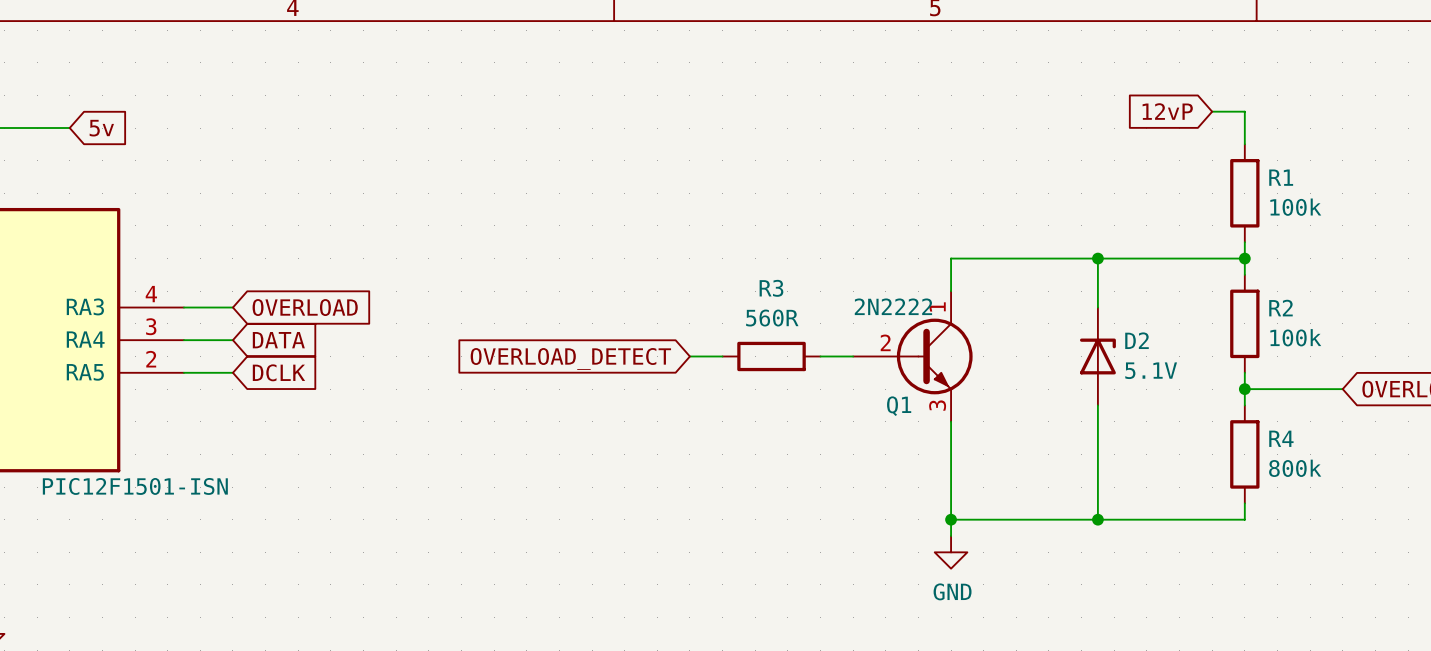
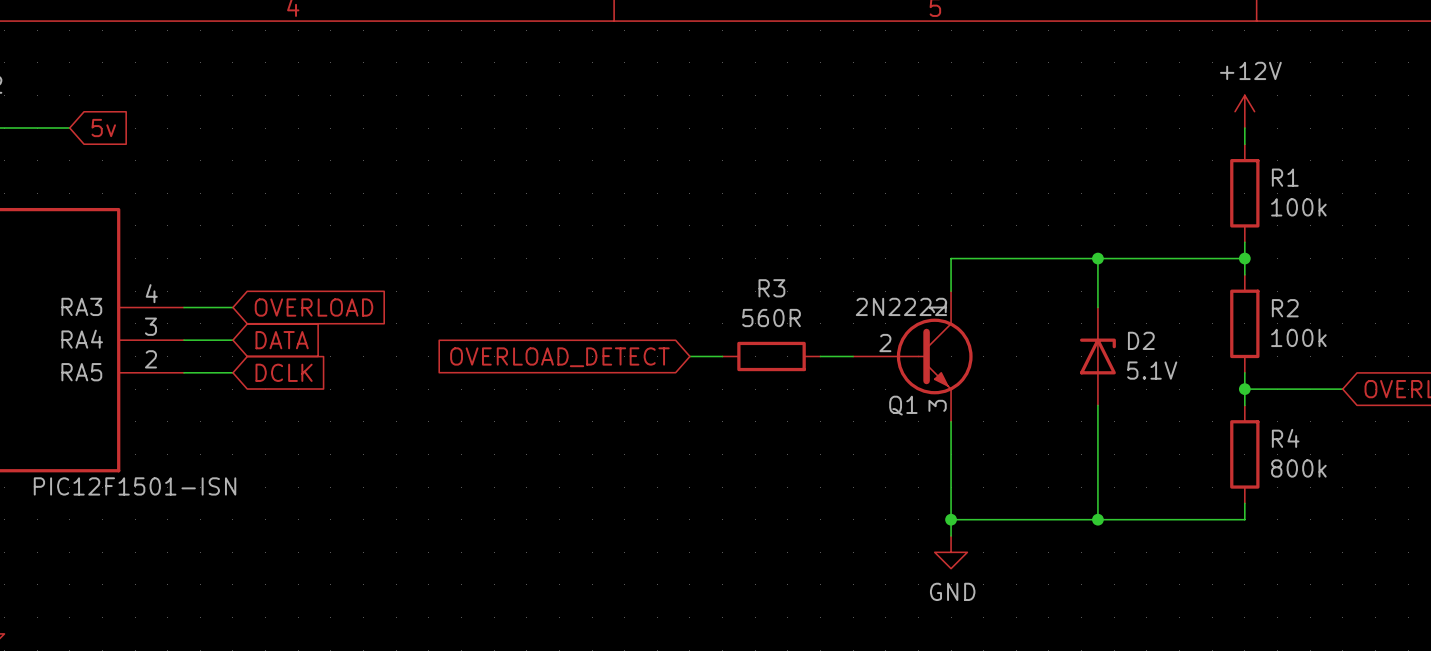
global label: 12vP (1167, 111) -> none
wire: (1212, 111) (1244, 111) (1244, 128) -> none
power symbol: none -> +12V (1244, 111)

